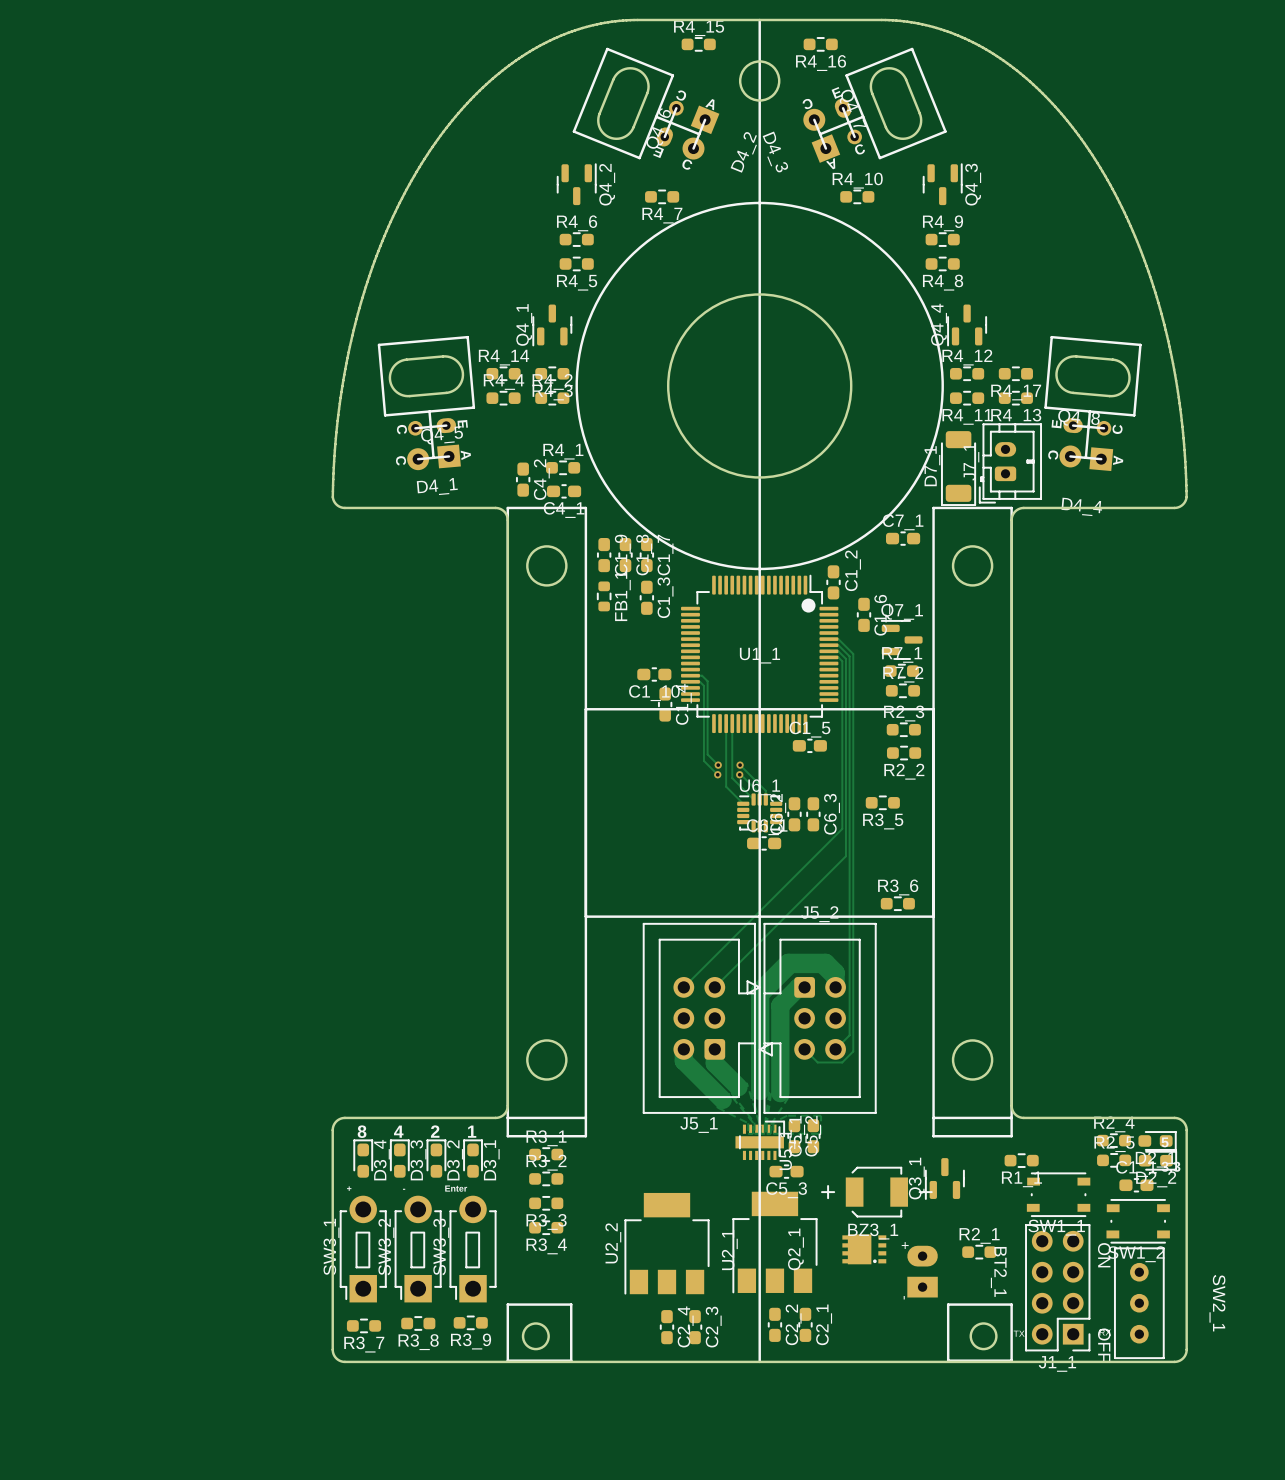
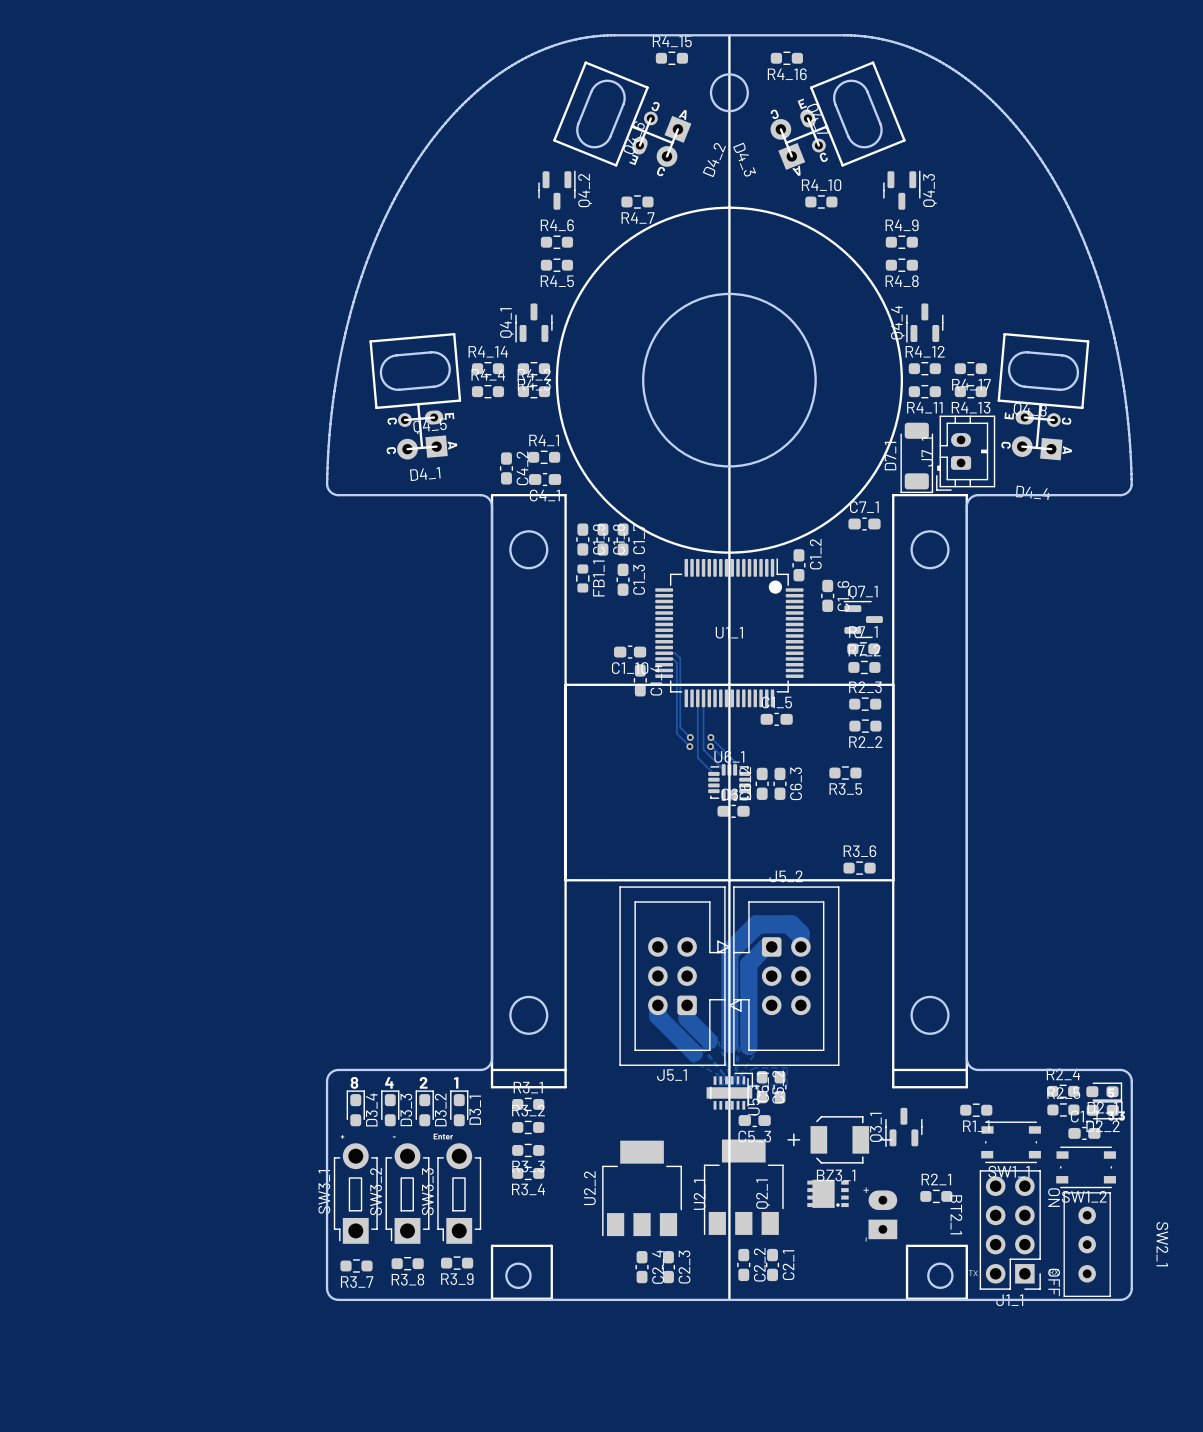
track: (828, 639) (838, 639) (853, 653) (853, 1051) (842, 1062) (817, 1062) (804, 1049) -> none
track: (828, 645) (838, 645) (849, 656) (849, 1035) (835, 1049) -> none
track: (828, 651) (838, 651) (845, 658) (845, 856) (714, 987) -> none
track: (828, 657) (838, 657) (842, 661) (842, 828) (683, 987) -> none

